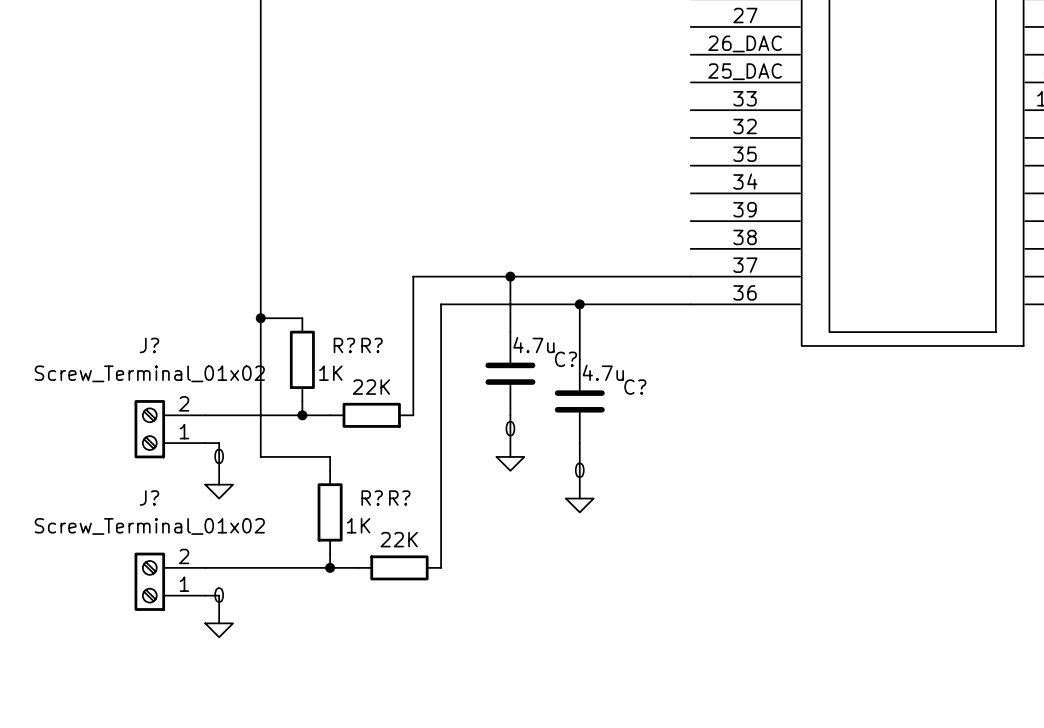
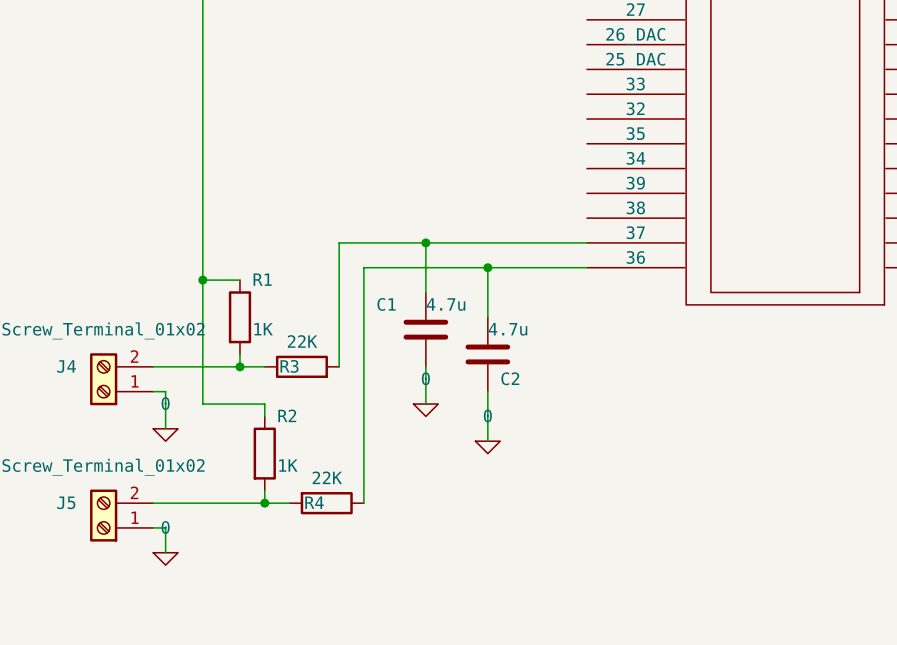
J? name: J? (149, 345) -> J4 (66, 366)
R? name: R? (344, 345) -> R1 (262, 279)
R? name: R? (372, 345) -> R3 (289, 366)
C? name: C? (566, 359) -> C1 (386, 304)
C? name: C? (635, 387) -> C2 (510, 378)
J? name: J? (149, 498) -> J5 (66, 502)
R? name: R? (372, 498) -> R2 (287, 415)
R? name: R? (399, 498) -> R4 (314, 502)

